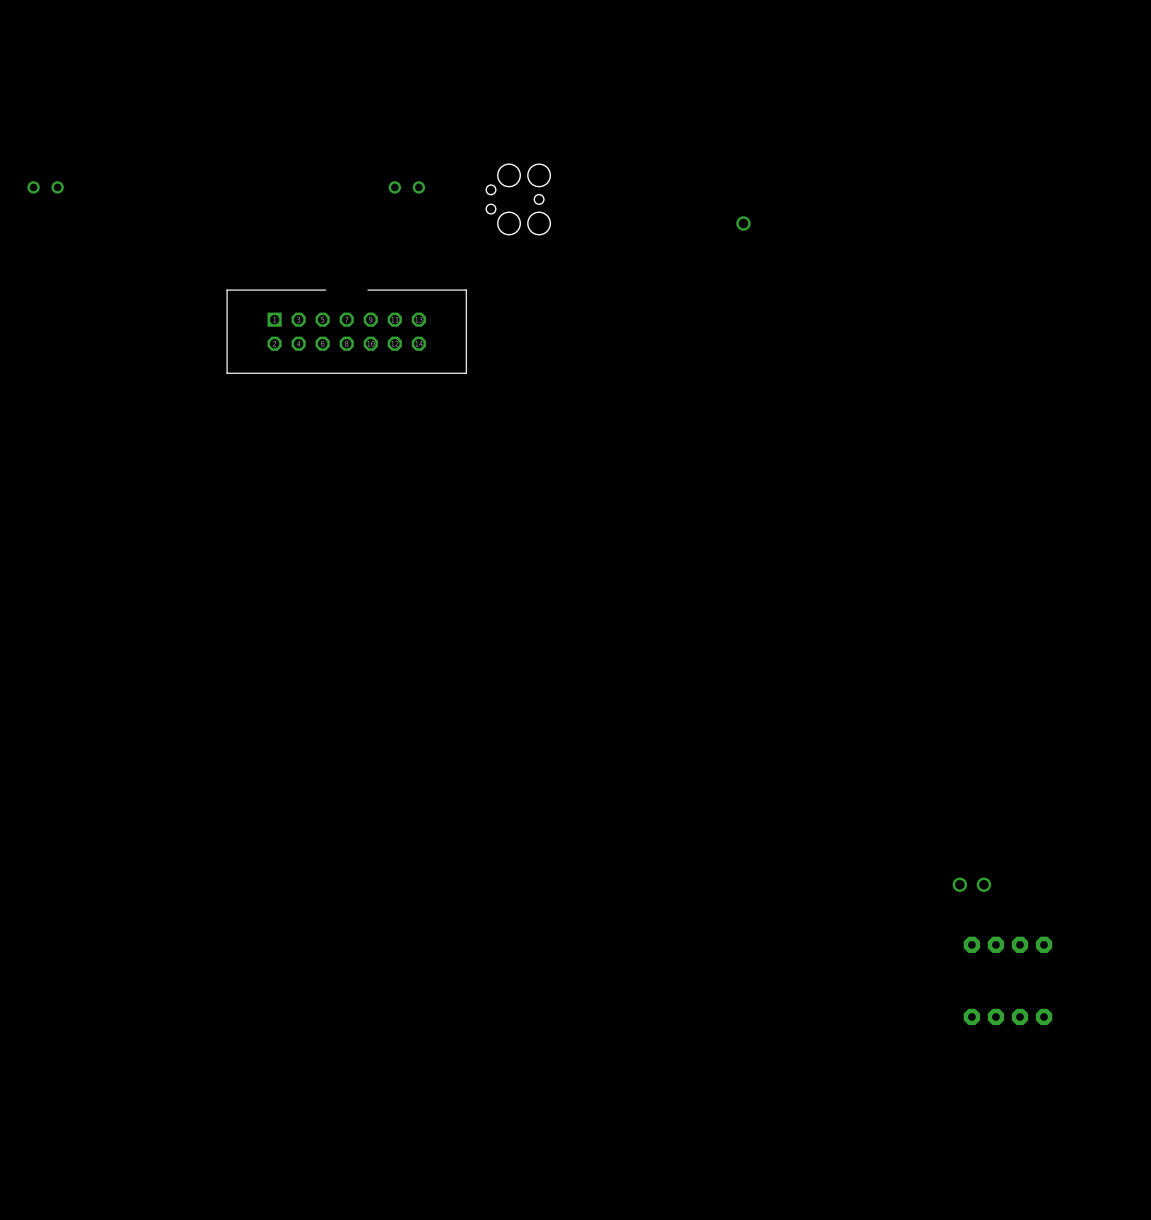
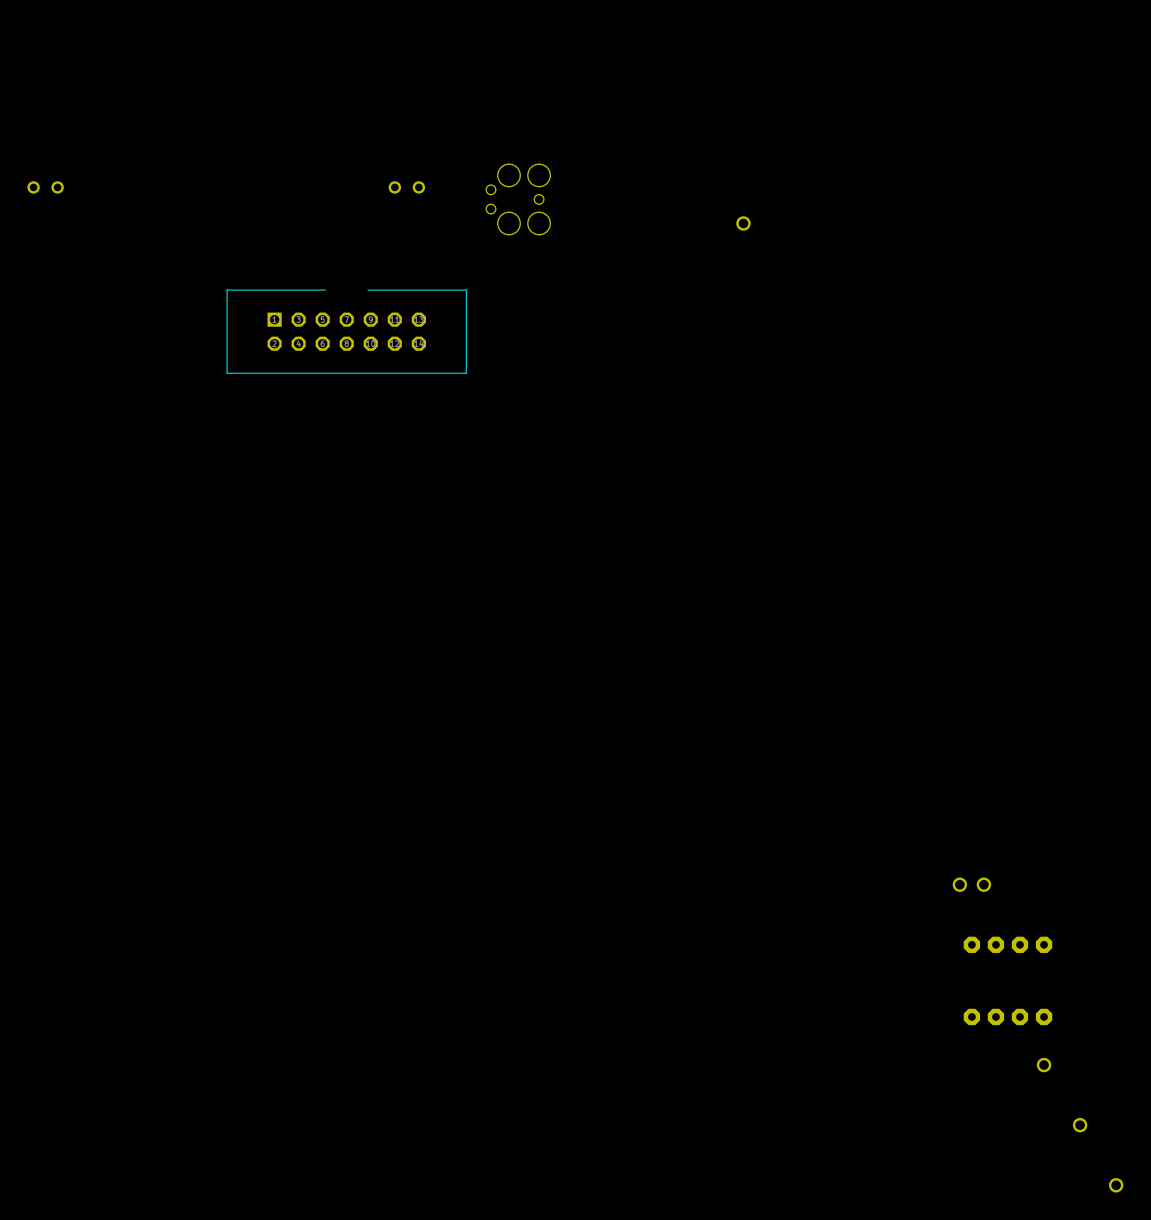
part: none -> (1044, 1065)
part: none -> (1080, 1125)
part: none -> (1116, 1185)

